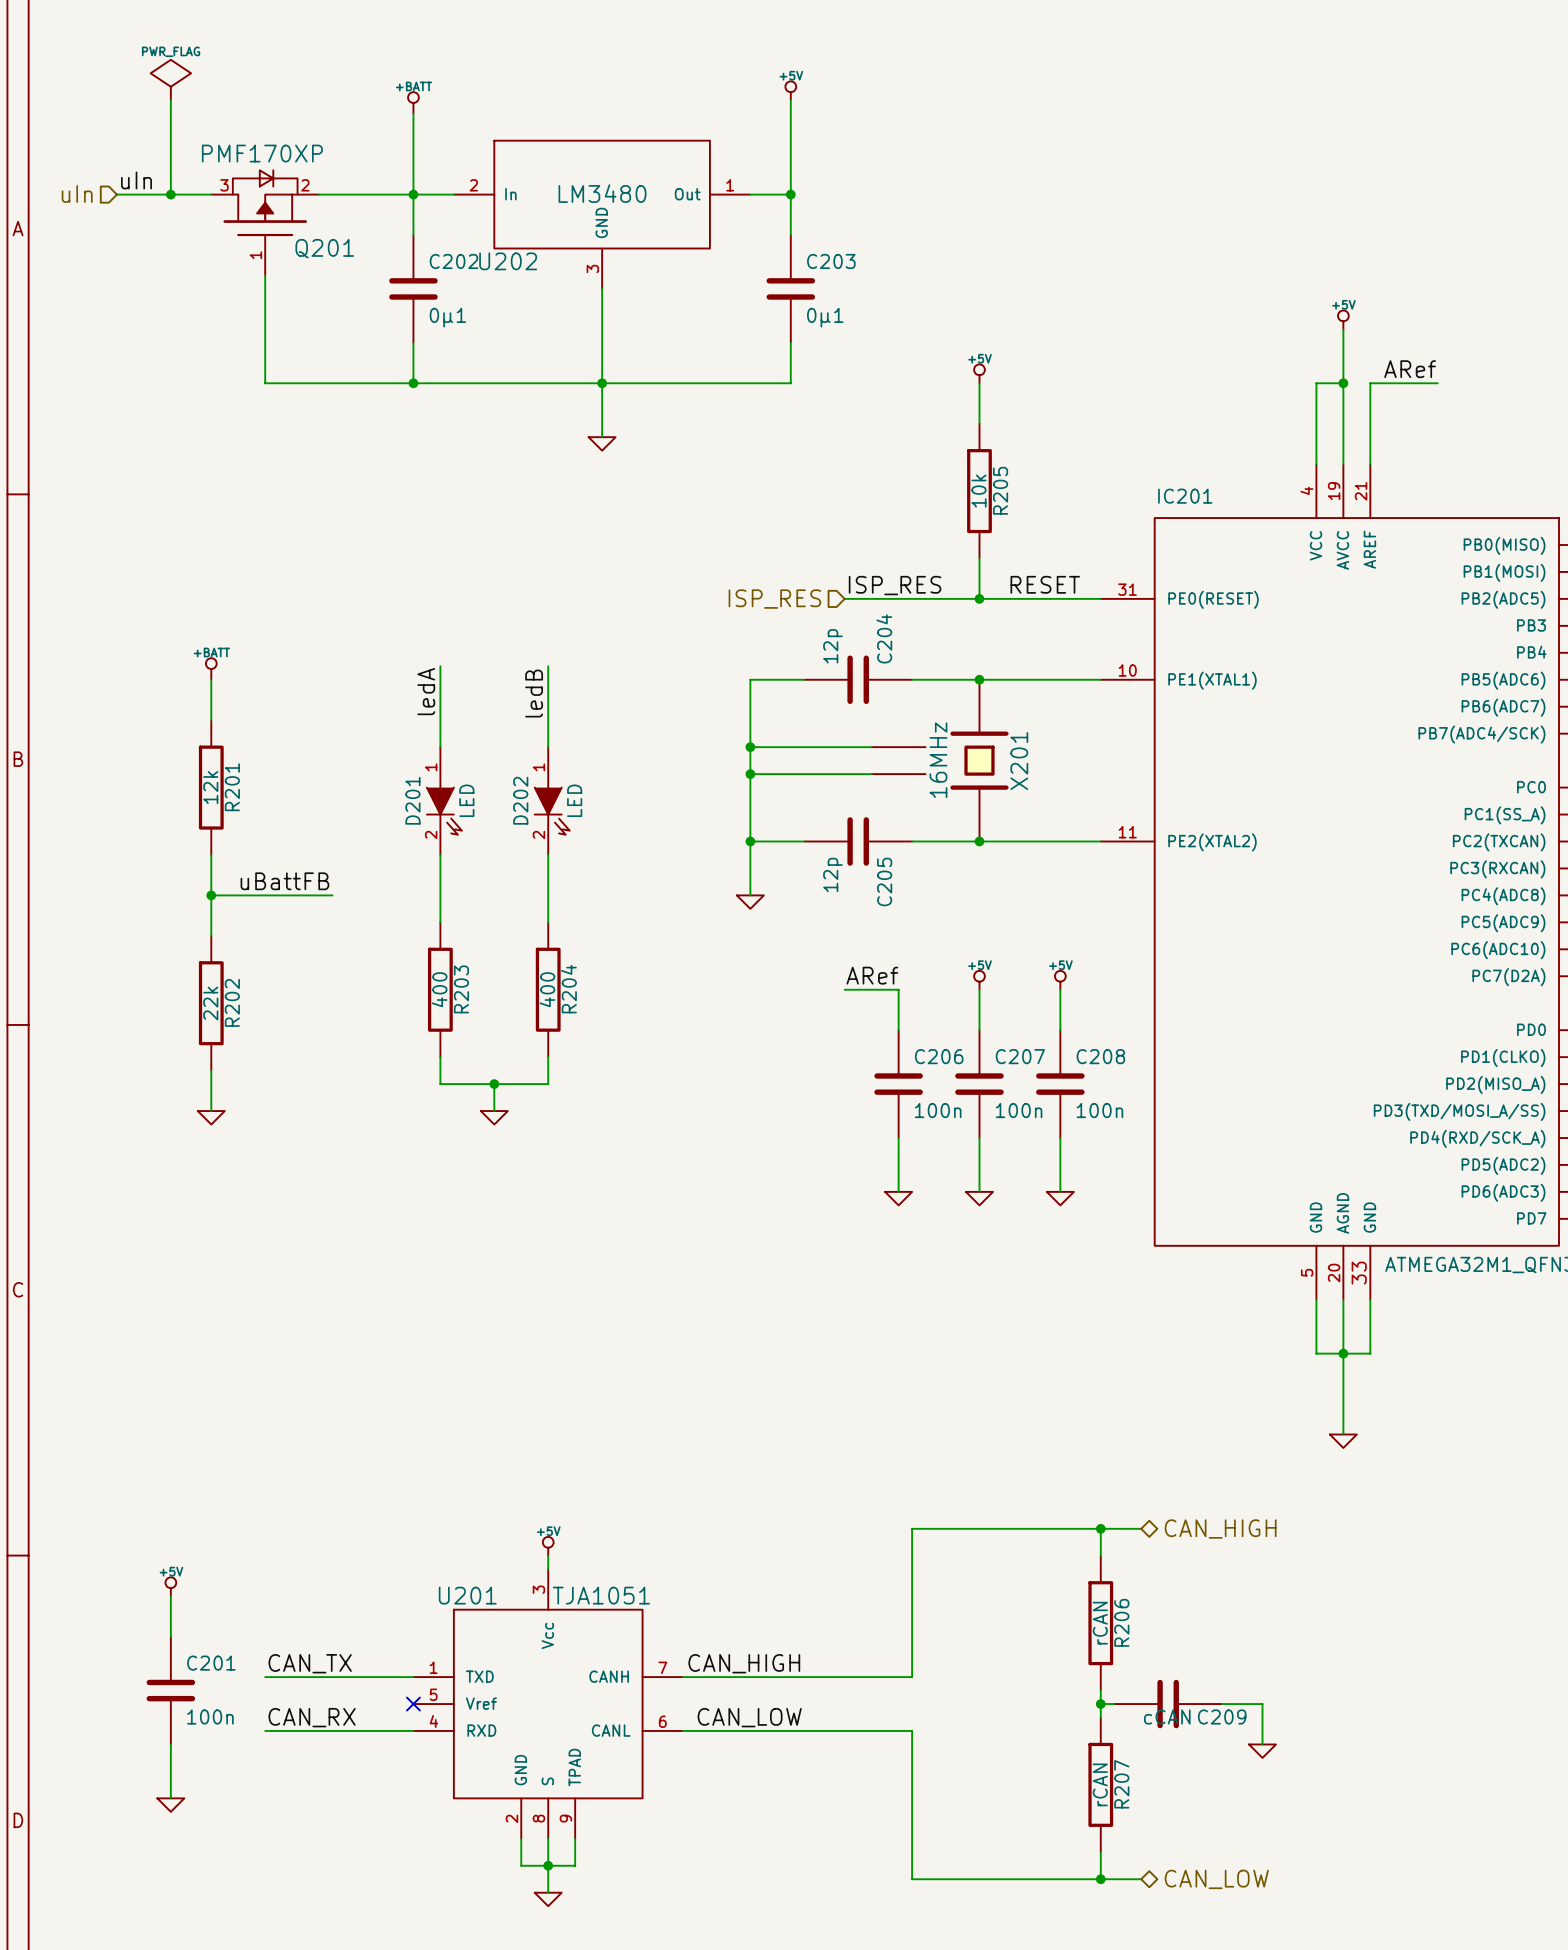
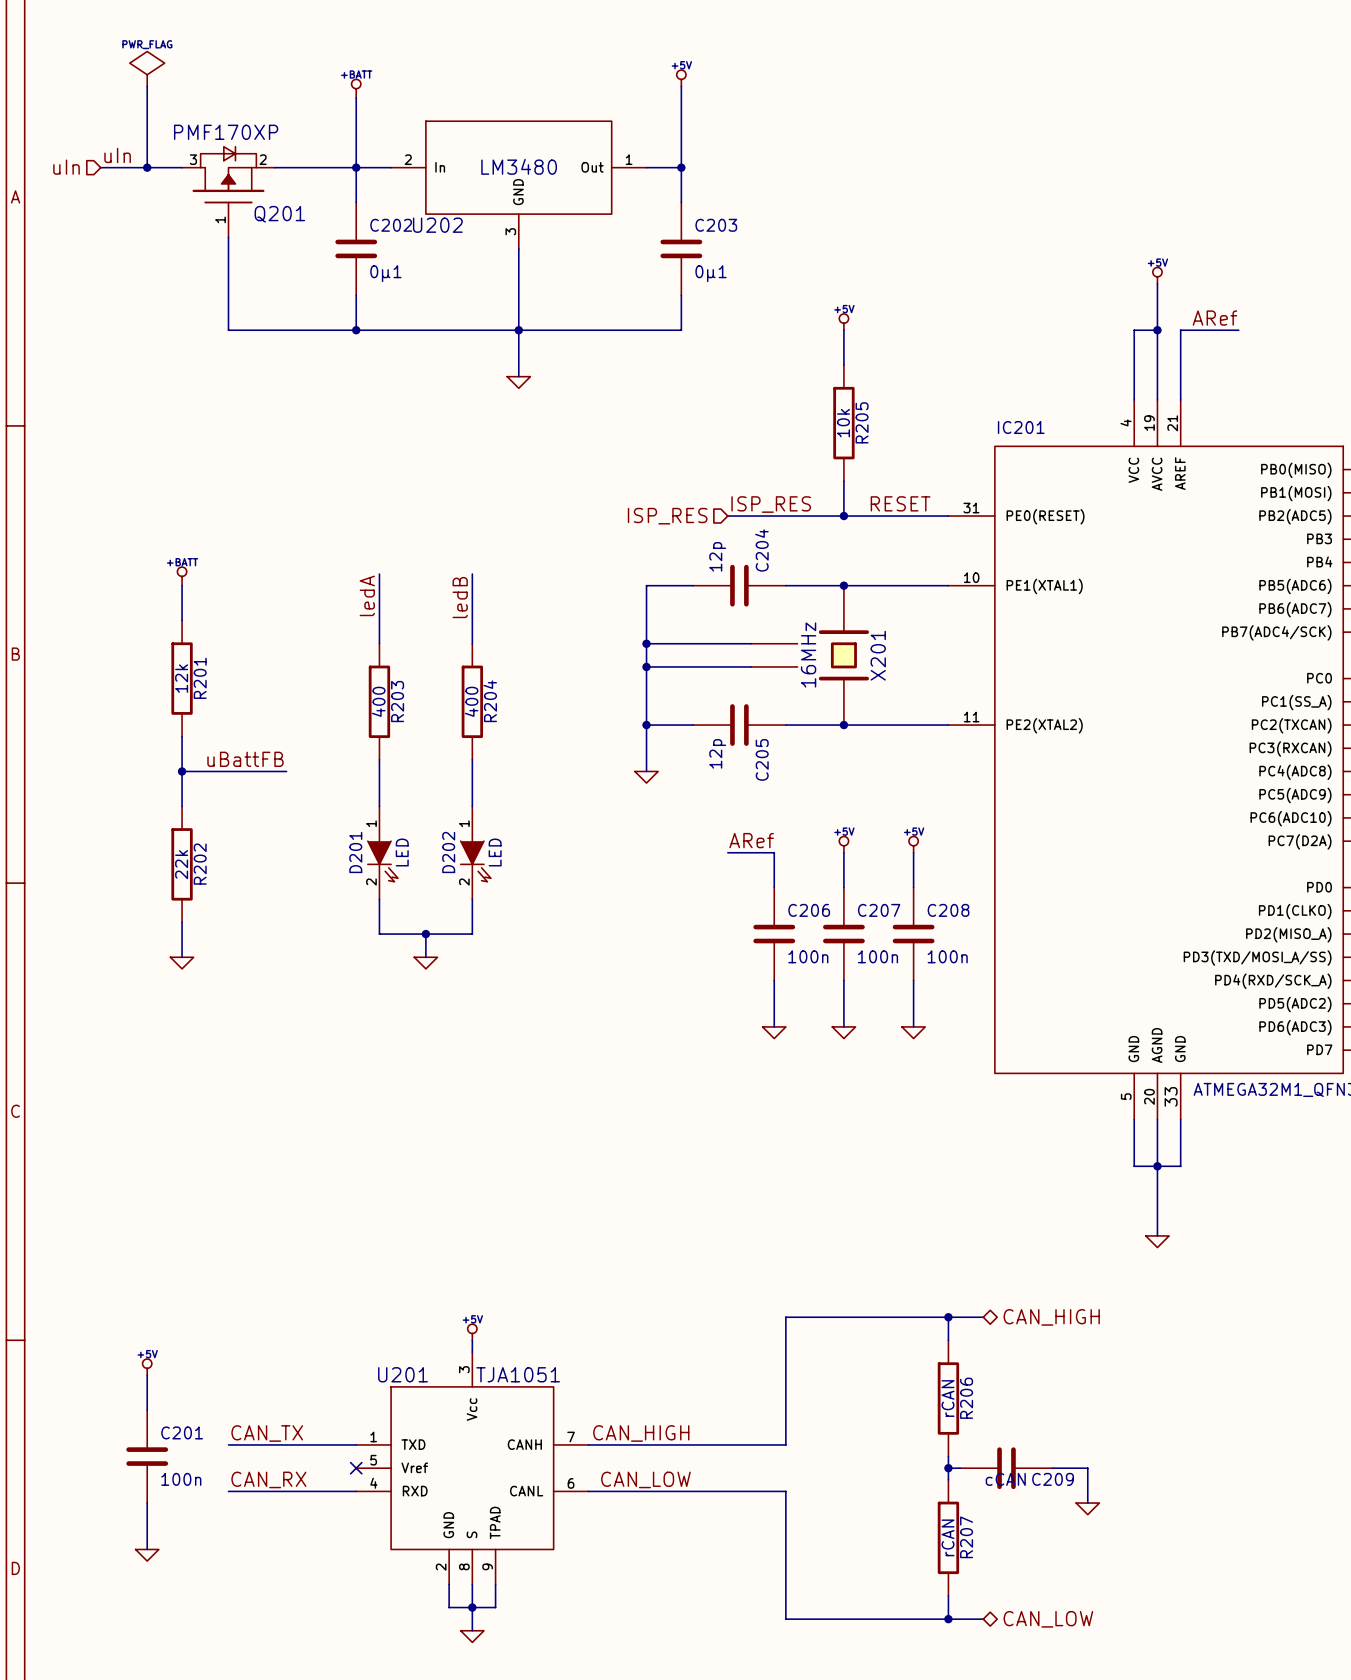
D201 position: (444, 801) -> (382, 852)
D202 position: (552, 801) -> (475, 852)
R203 position: (440, 989) -> (379, 701)
R204 position: (548, 989) -> (472, 701)

